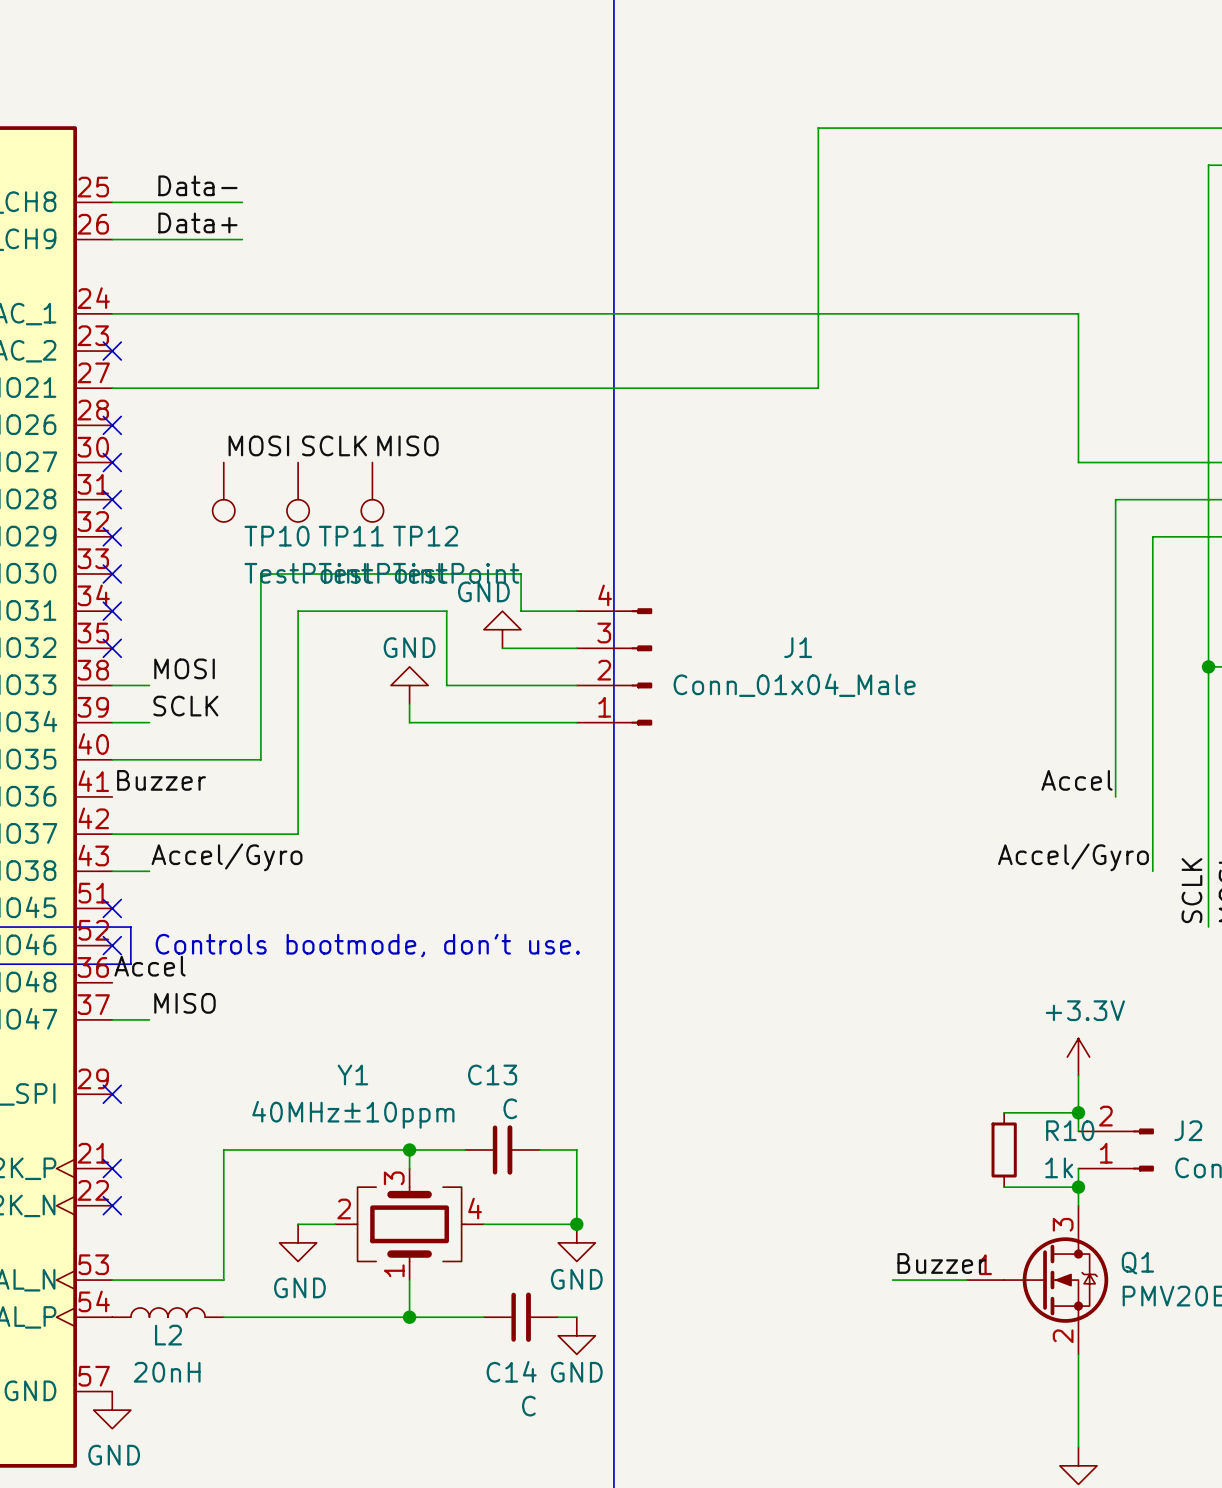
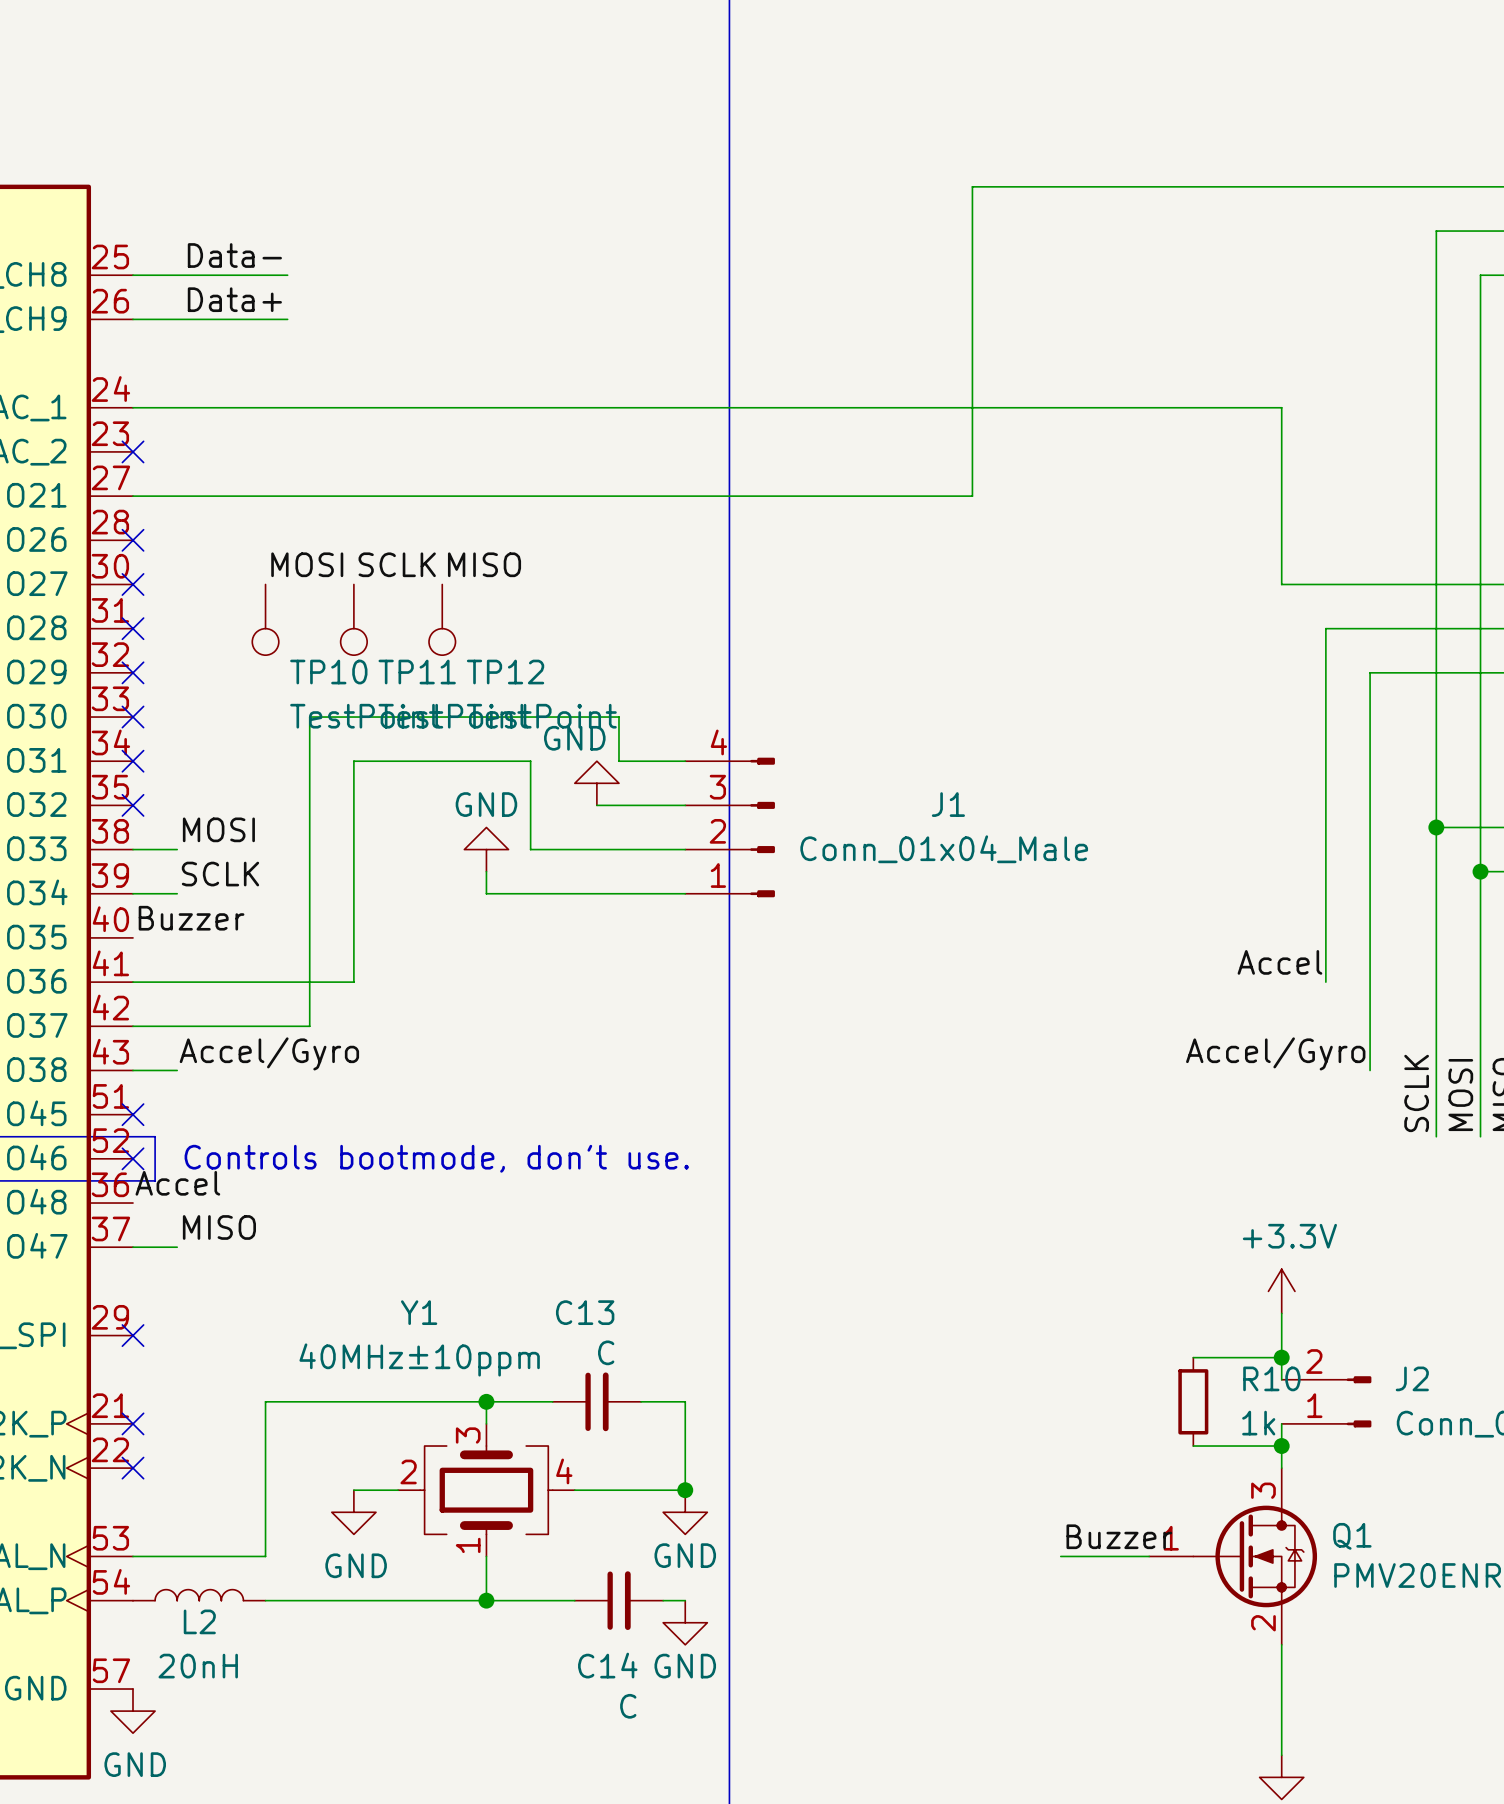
wire: (112, 759) (260, 759) -> none
label position: Buzzer (161, 780) -> Buzzer (191, 918)
wire: none -> (132, 982) (353, 982)
wire: (298, 796) (298, 834) (260, 834) -> (309, 937) (309, 1026)

